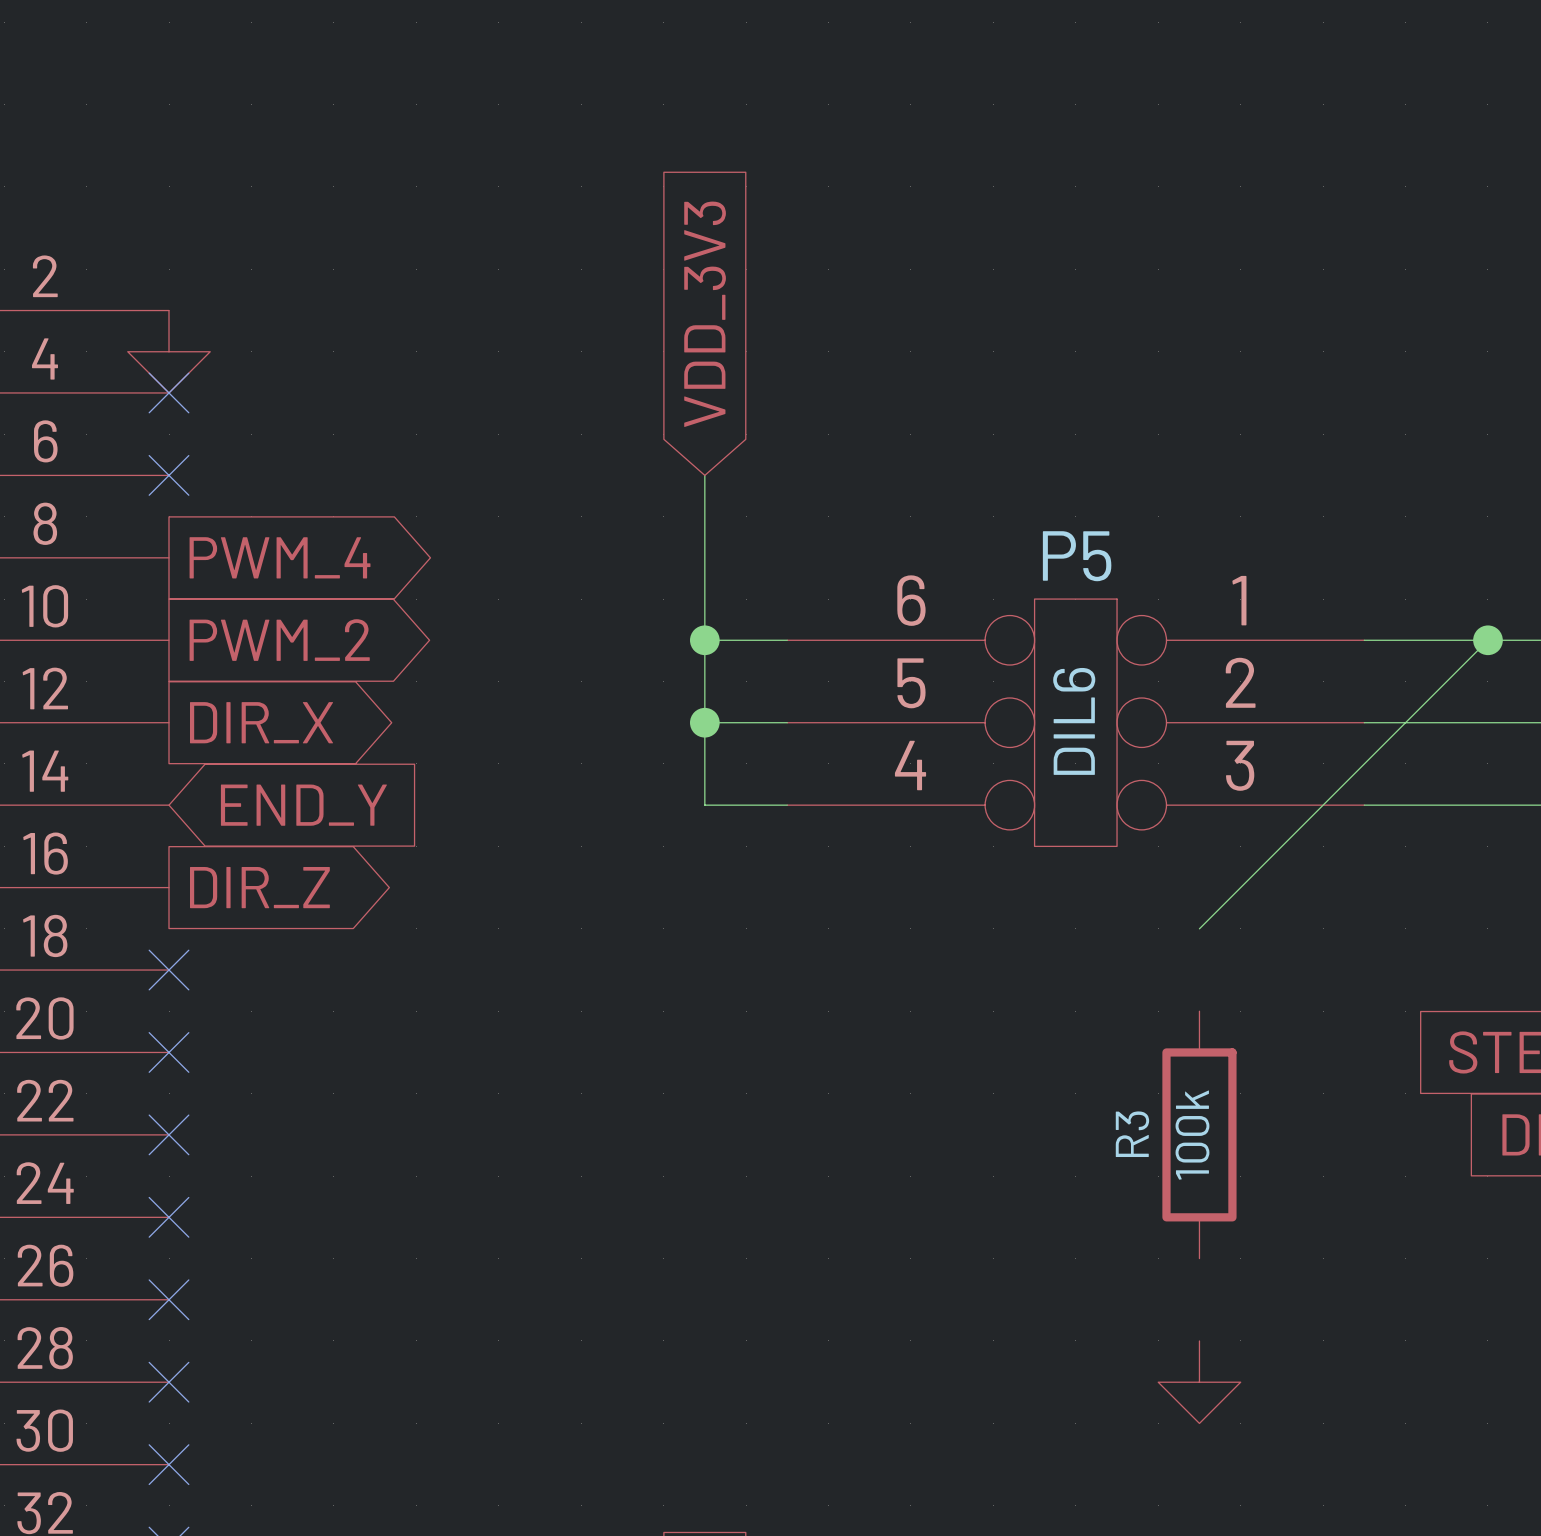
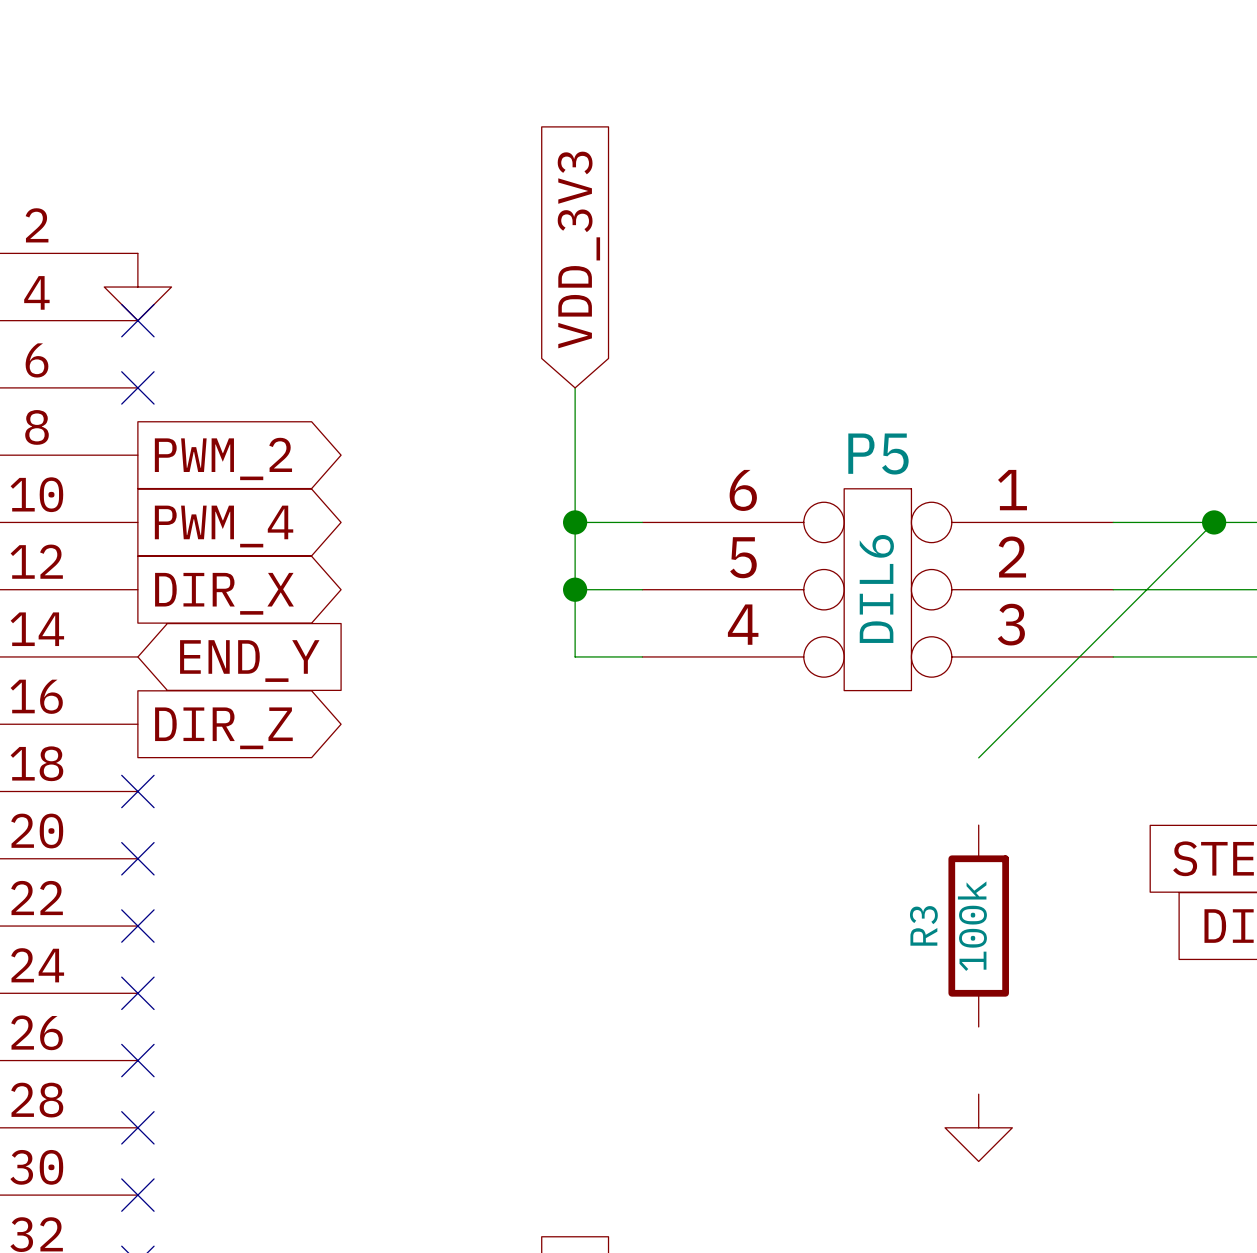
global label: PWM_4 (280, 557) -> PWM_2 (223, 458)
global label: PWM_2 (279, 640) -> PWM_4 (224, 526)

